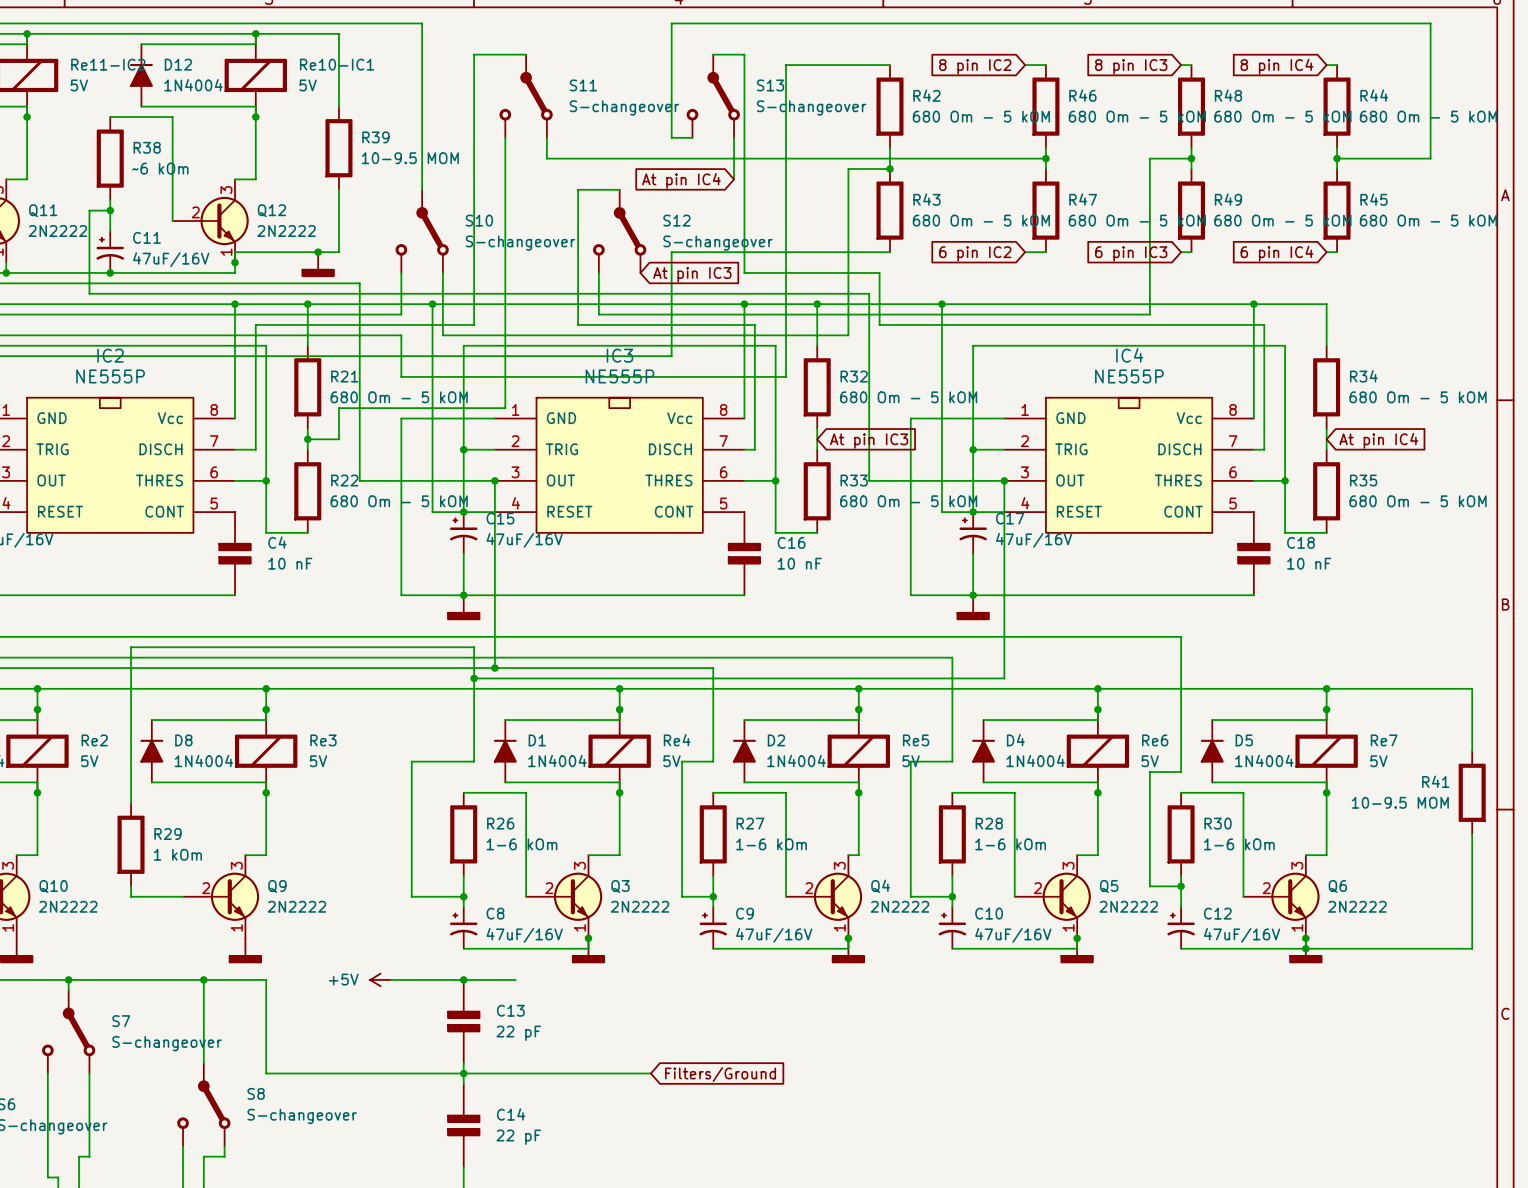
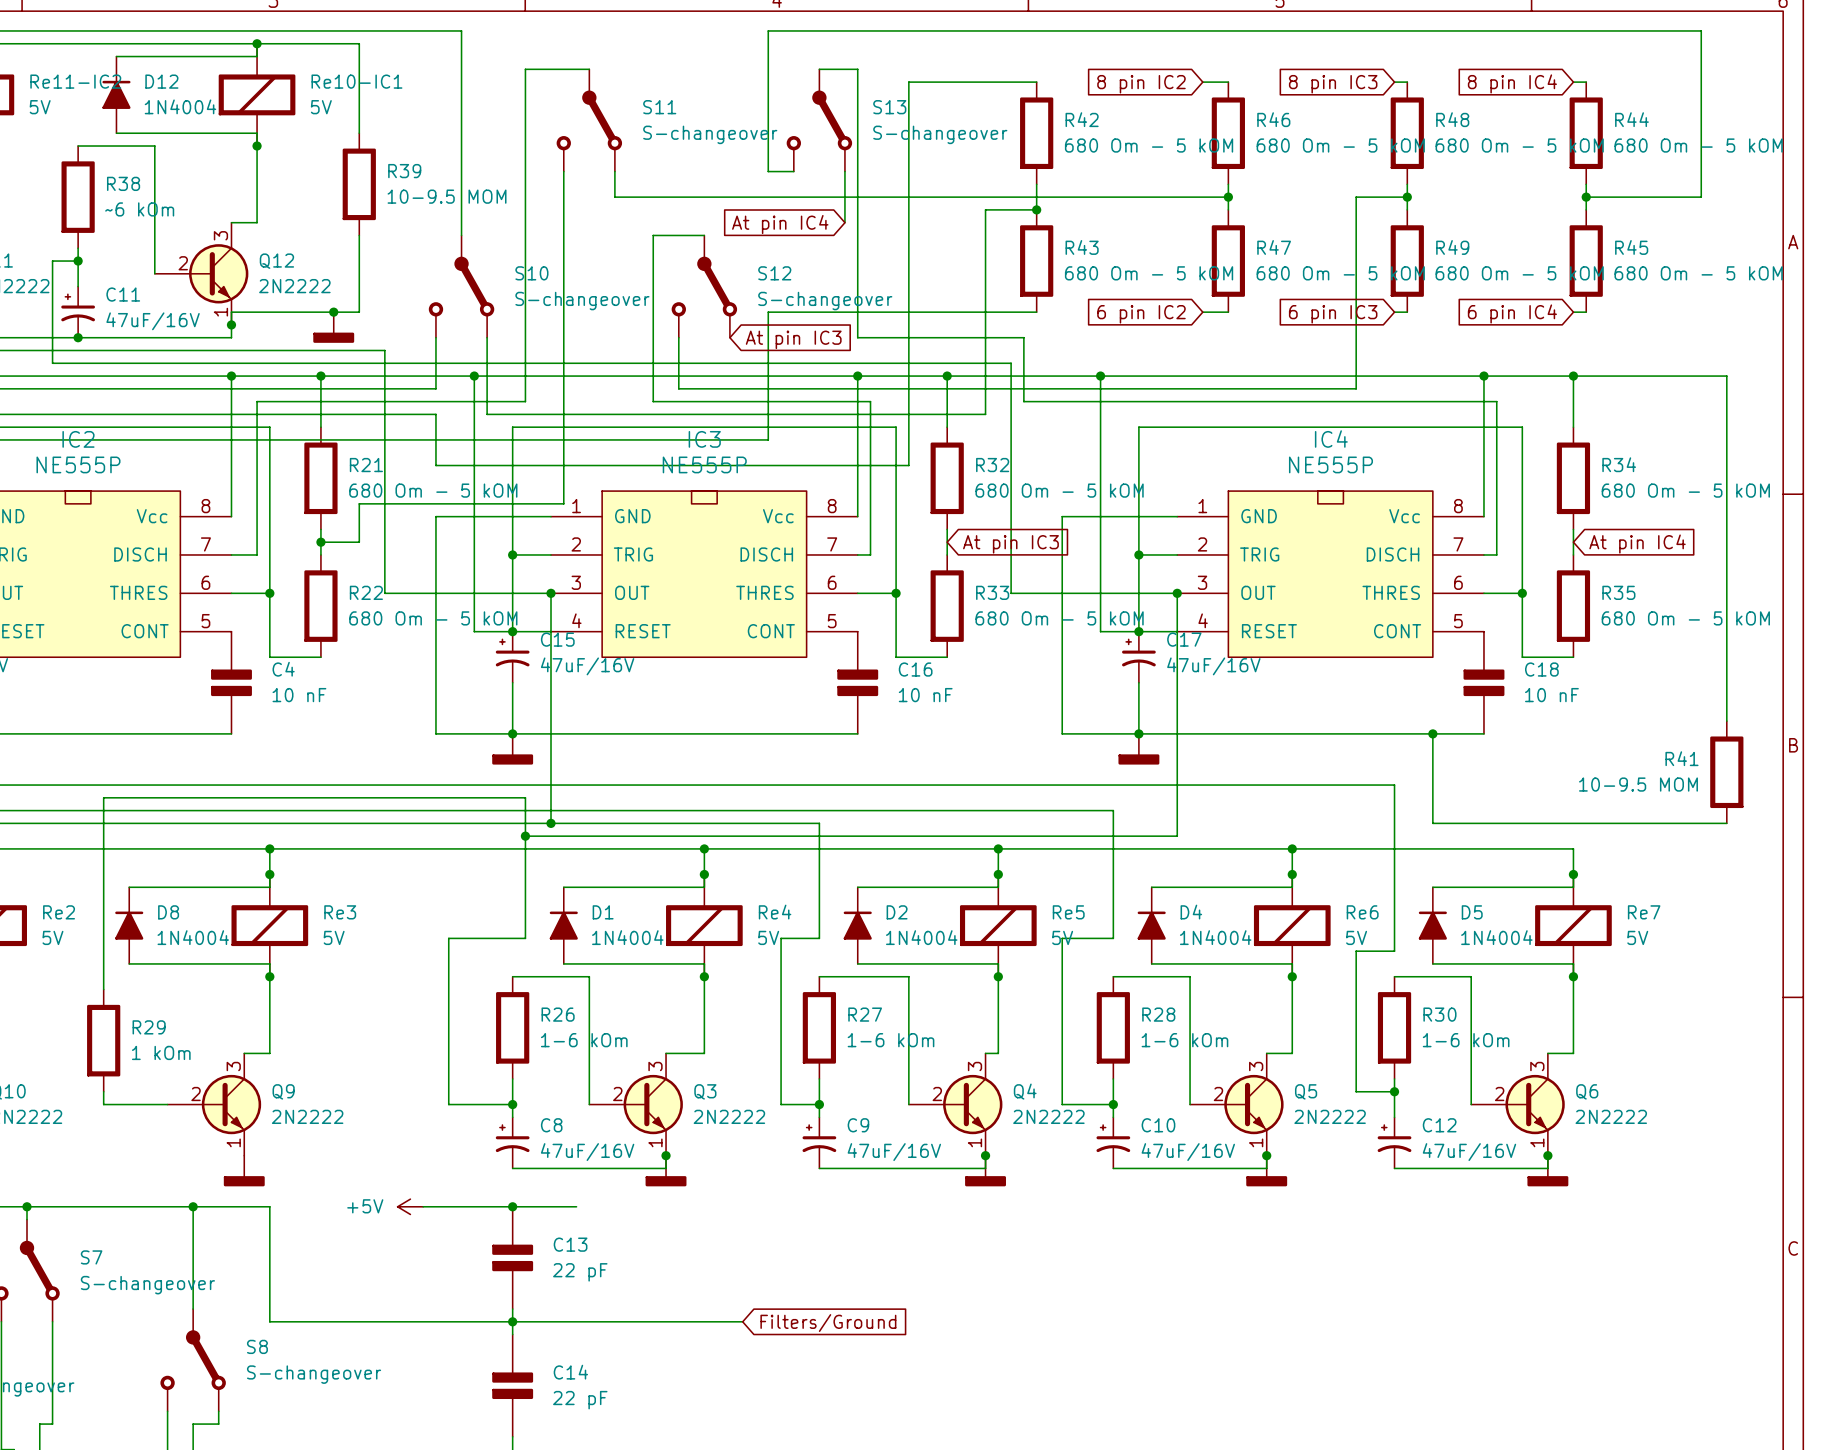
wire: none -> (1573, 376) (1726, 376) (1726, 721)
junction: none -> (1573, 376)
wire: none -> (1432, 733) (1432, 823) (1726, 823)
junction: none -> (1432, 733)
wire: (1326, 688) (1472, 688) (1472, 751) -> none
junction: (1326, 688) -> none
R41 position: (1472, 792) -> (1726, 772)
wire: (1472, 834) (1472, 948) (1305, 948) -> none
junction: (1305, 948) -> none

